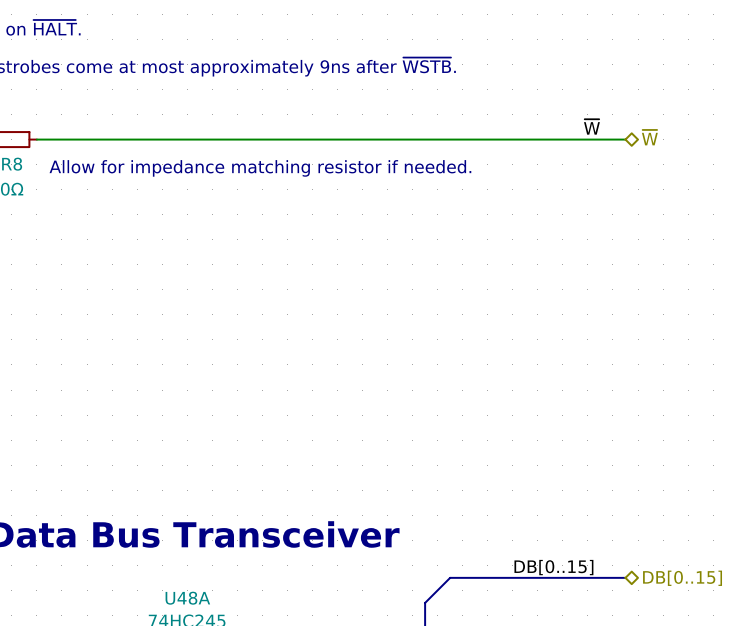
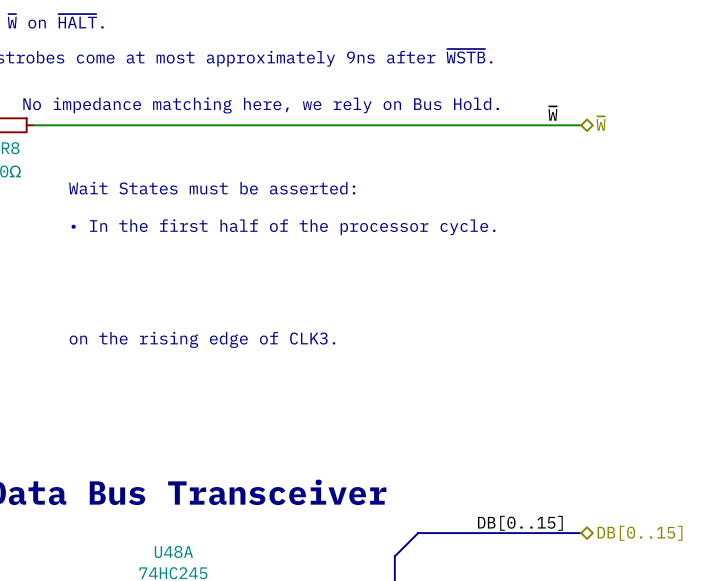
text: none -> No impedance matching here, we rely on Bus Hold. (261, 105)
text: Allow for impedance matching resistor if needed. (260, 168) -> none
text: none -> Wait States must be asserted: (212, 188)
text: none -> • In the first half of the processor cycle. (283, 227)
text: none -> on the rising edge of CLK3. (202, 339)

